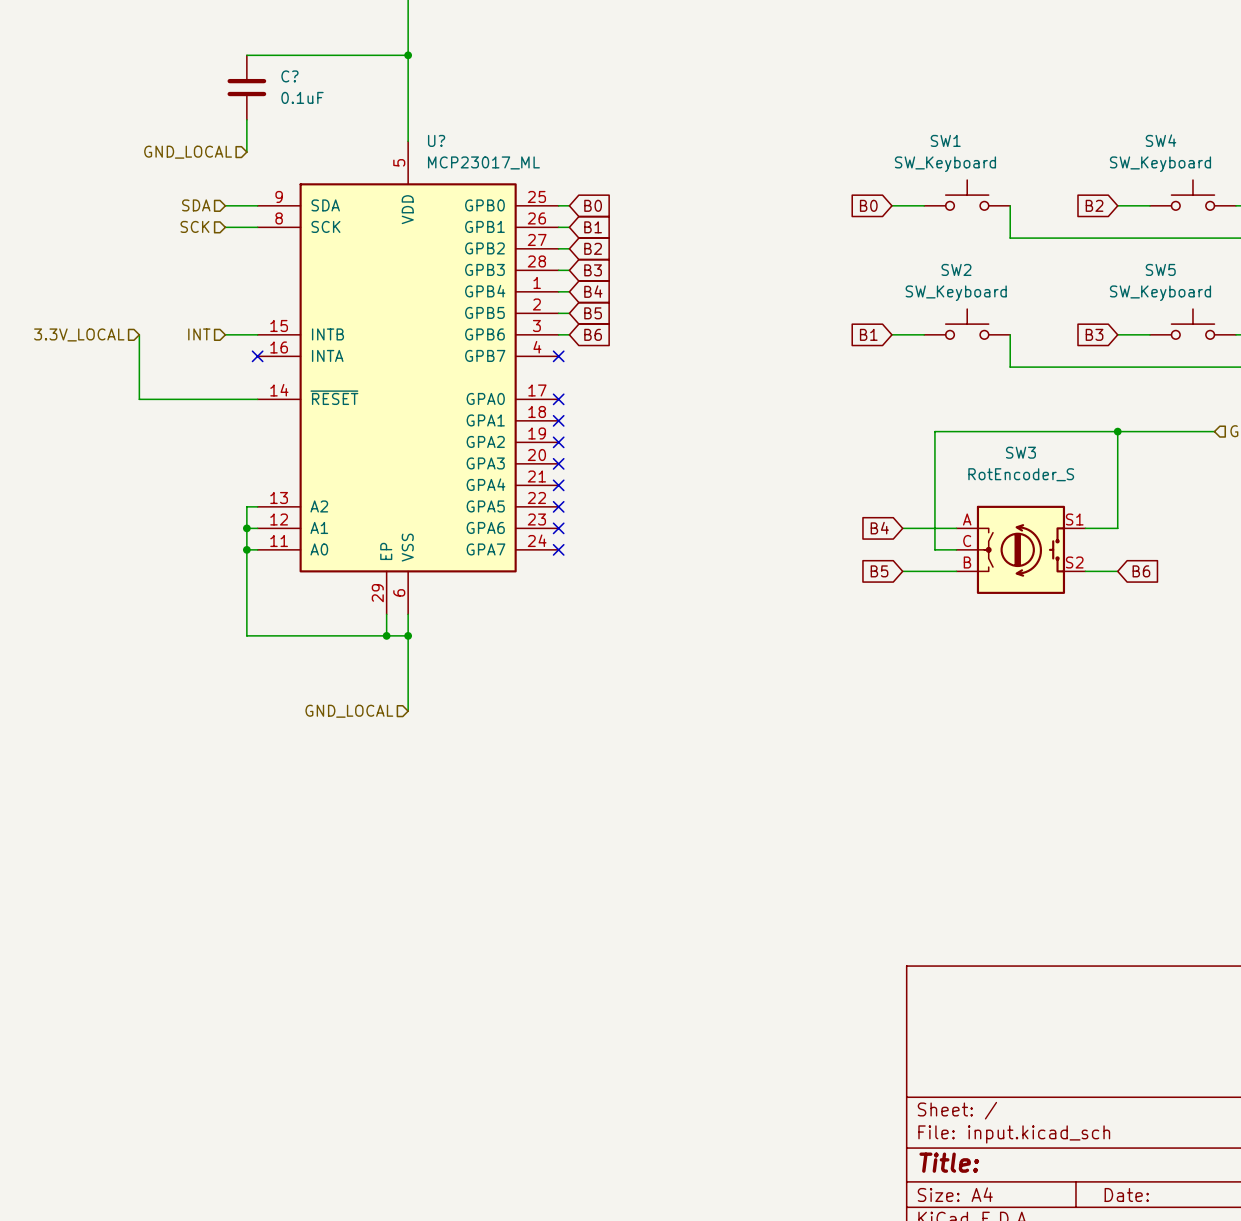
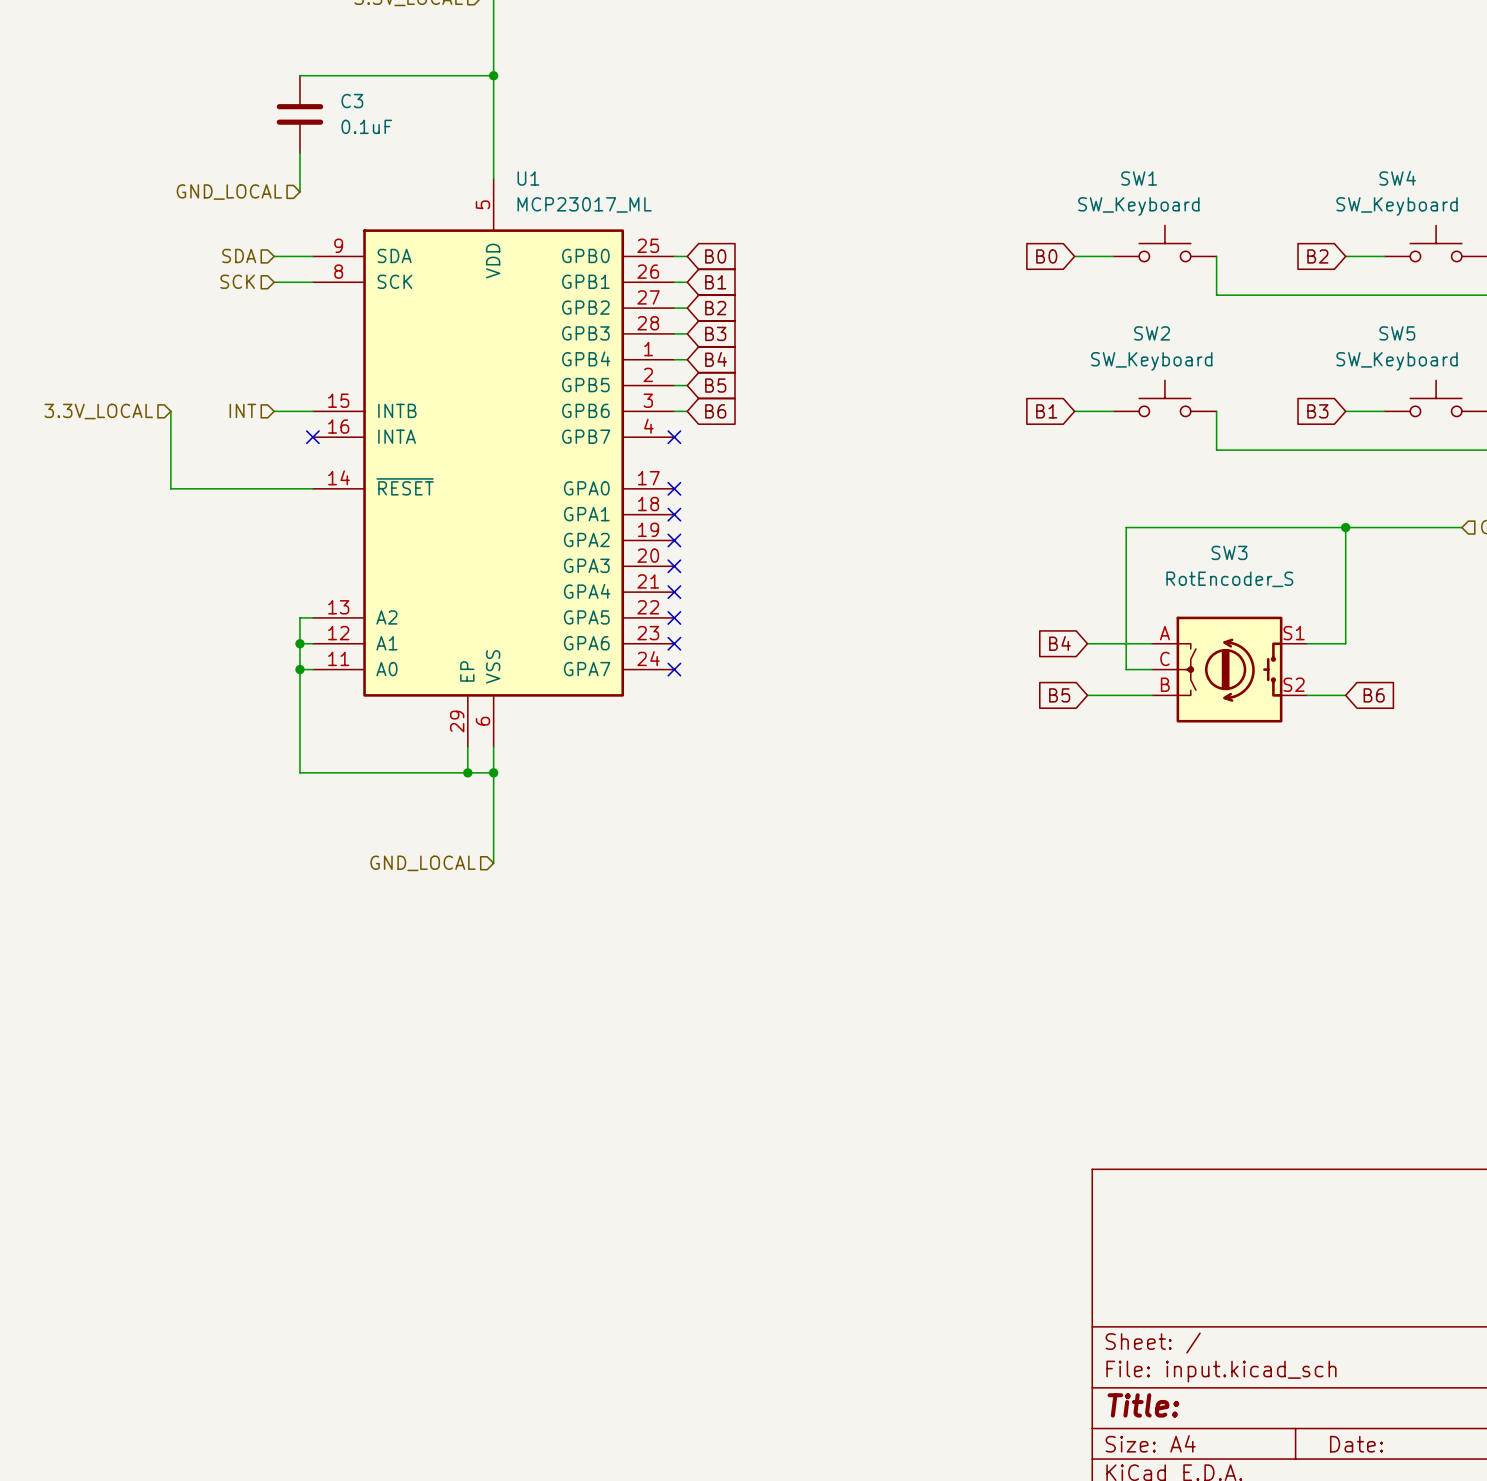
C? name: C? (289, 76) -> C3 (352, 101)
U? name: U? (436, 140) -> U1 (528, 178)

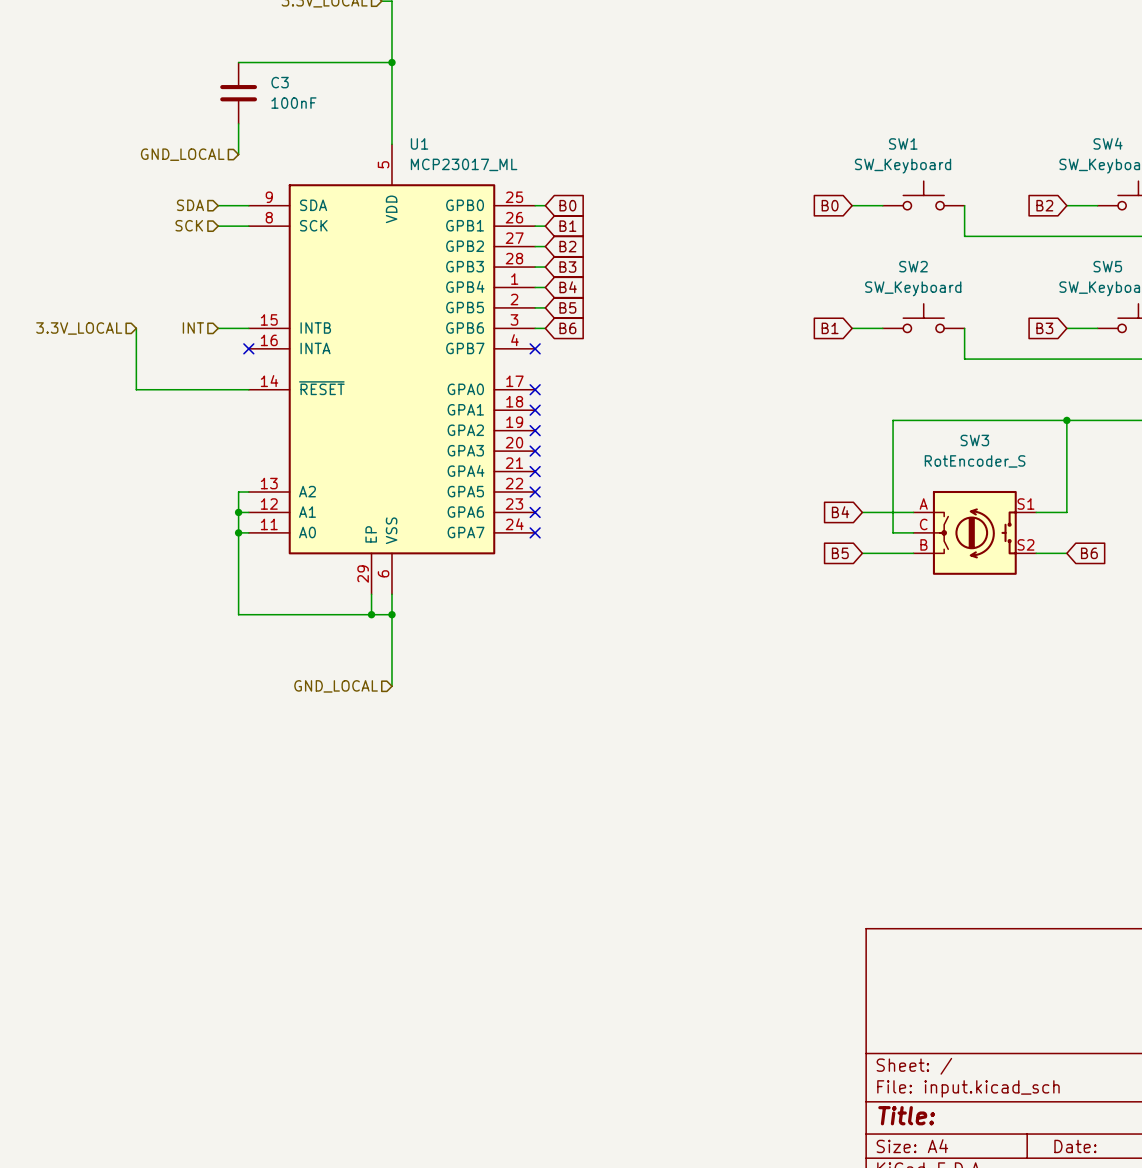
C3 value: 0.1uF (366, 126) -> 100nF (293, 103)

